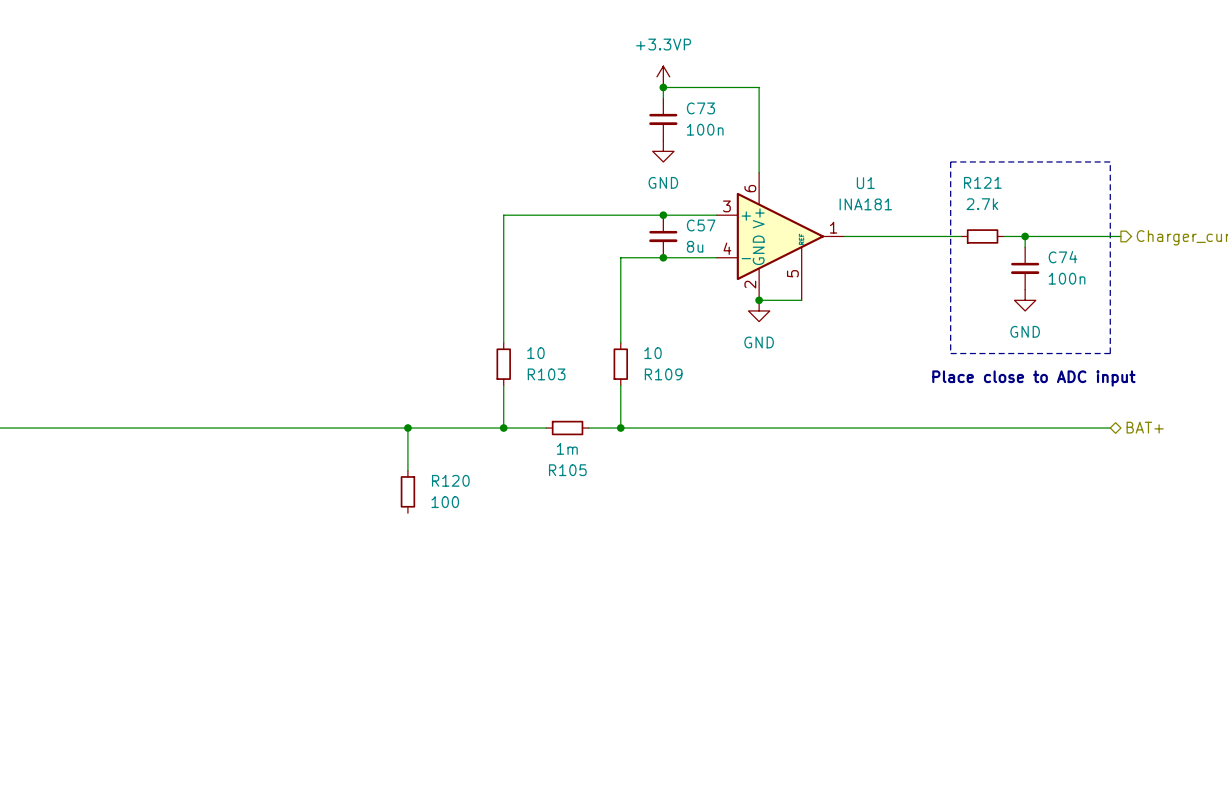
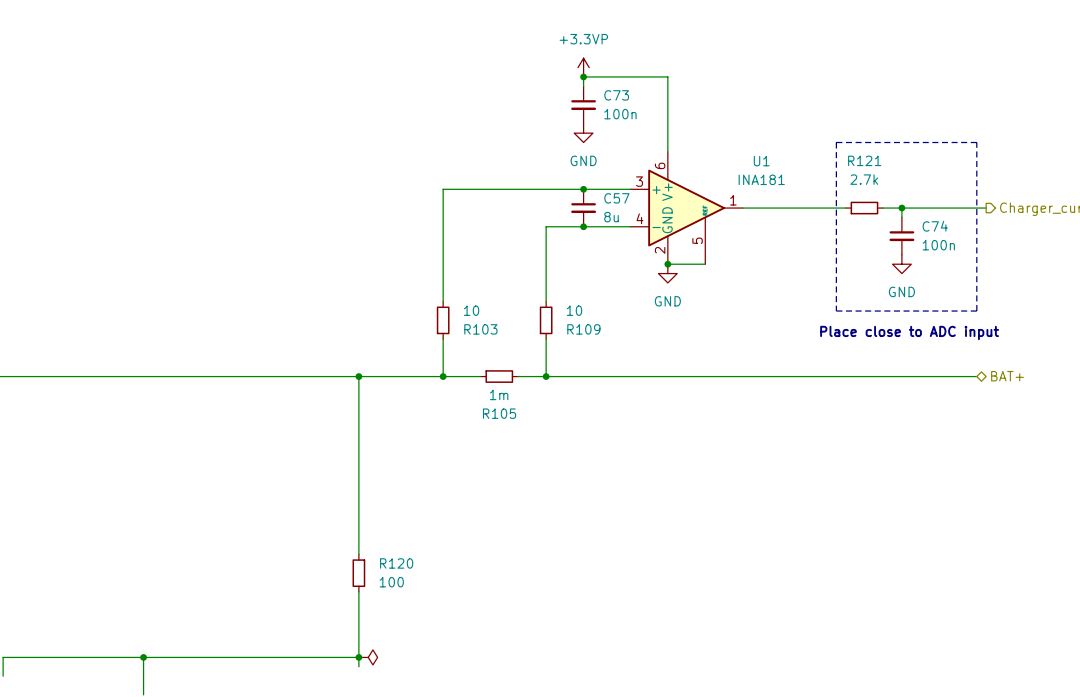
wire: none -> (358, 414) (358, 554)
R120 position: (407, 491) -> (358, 573)
wire: none -> (358, 591) (358, 666)
wire: none -> (143, 657) (143, 694)
junction: none -> (143, 657)
wire: none -> (358, 657) (3, 657) (3, 676)
junction: none -> (358, 657)
power symbol: none -> (368, 657)

